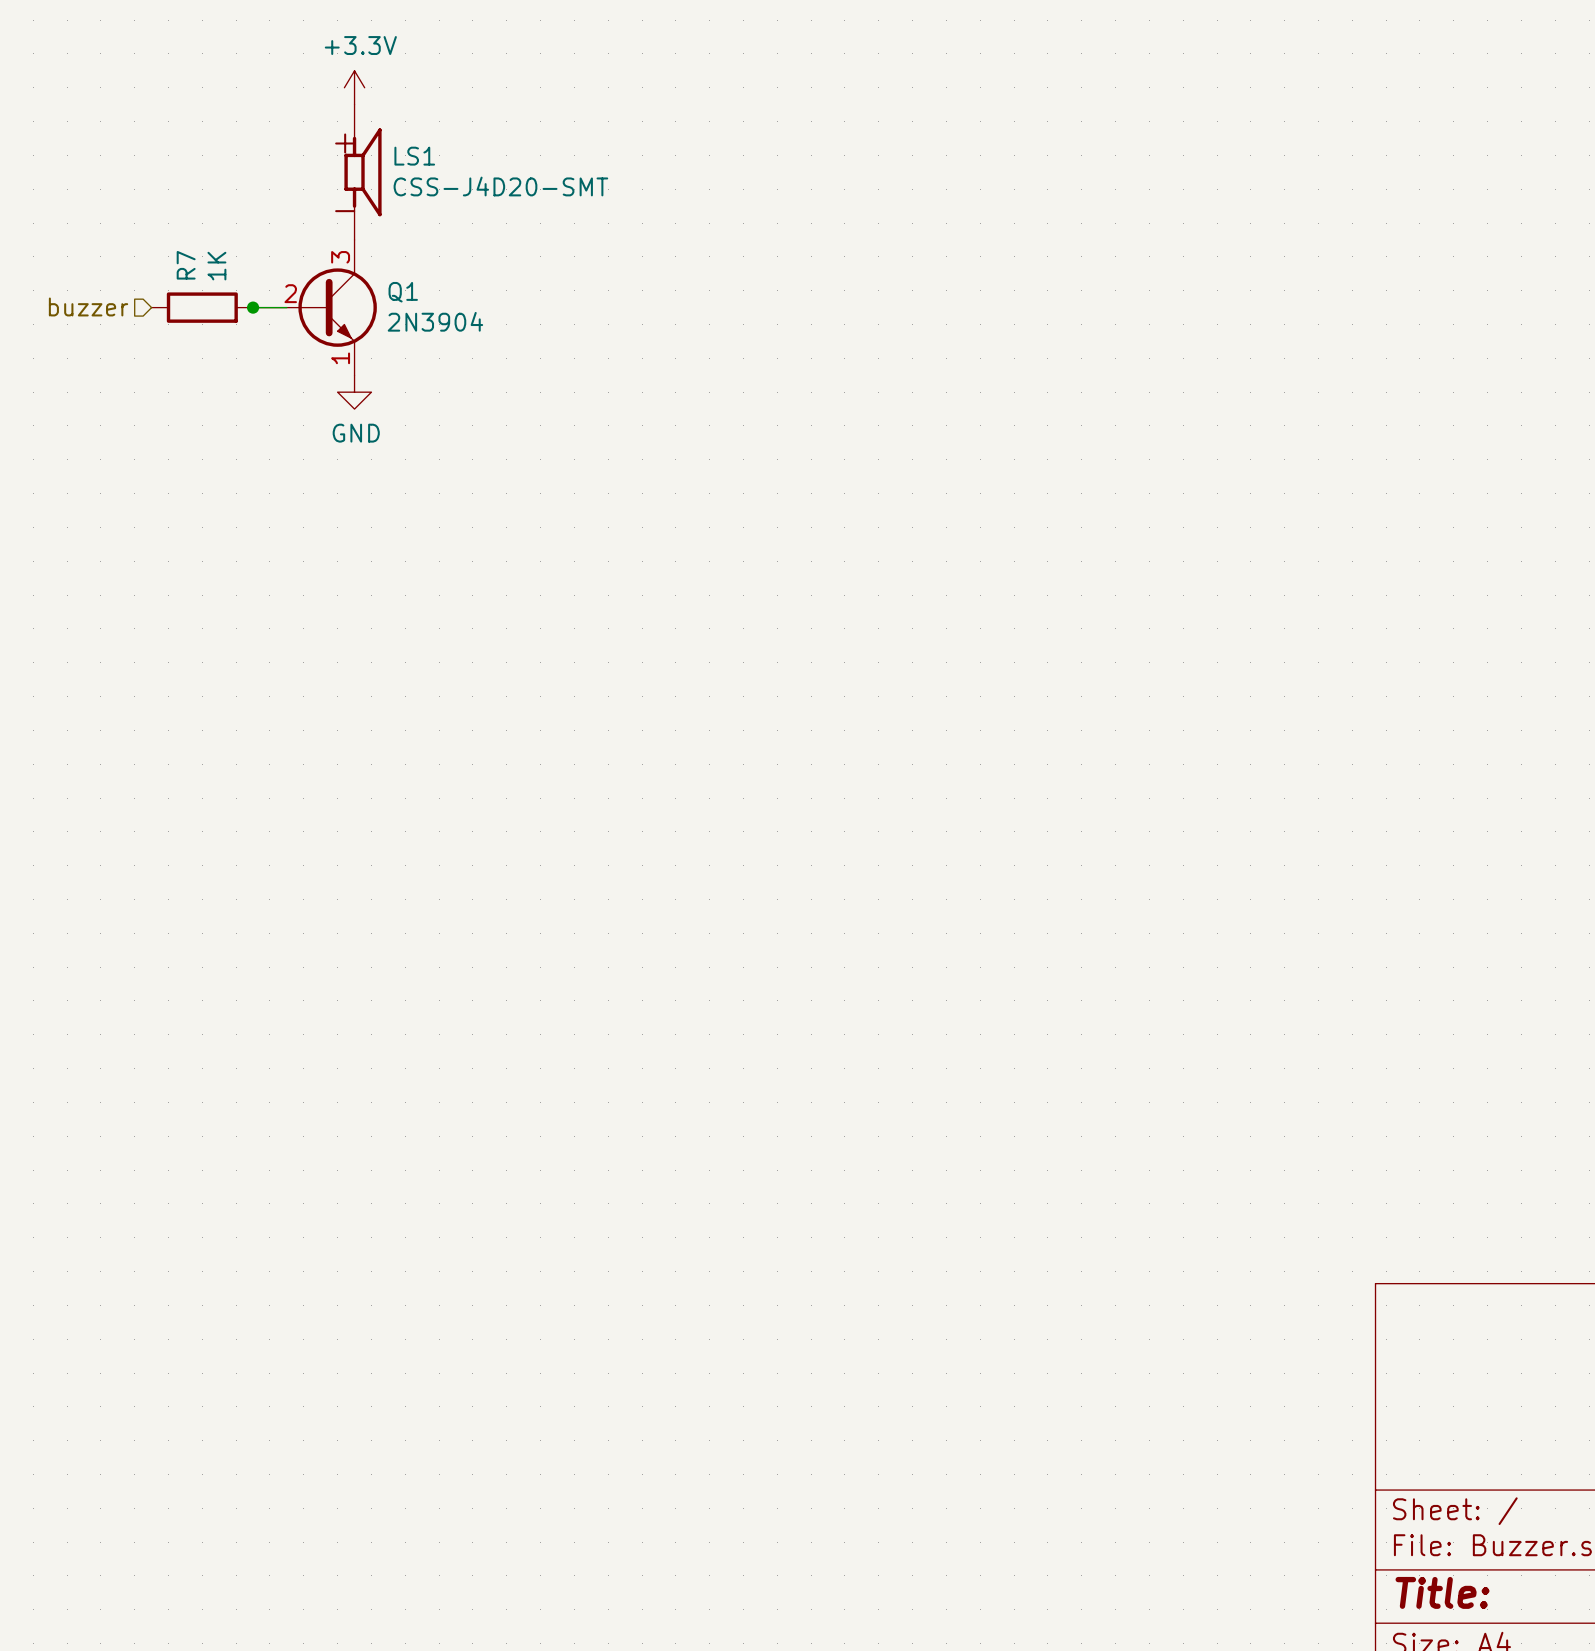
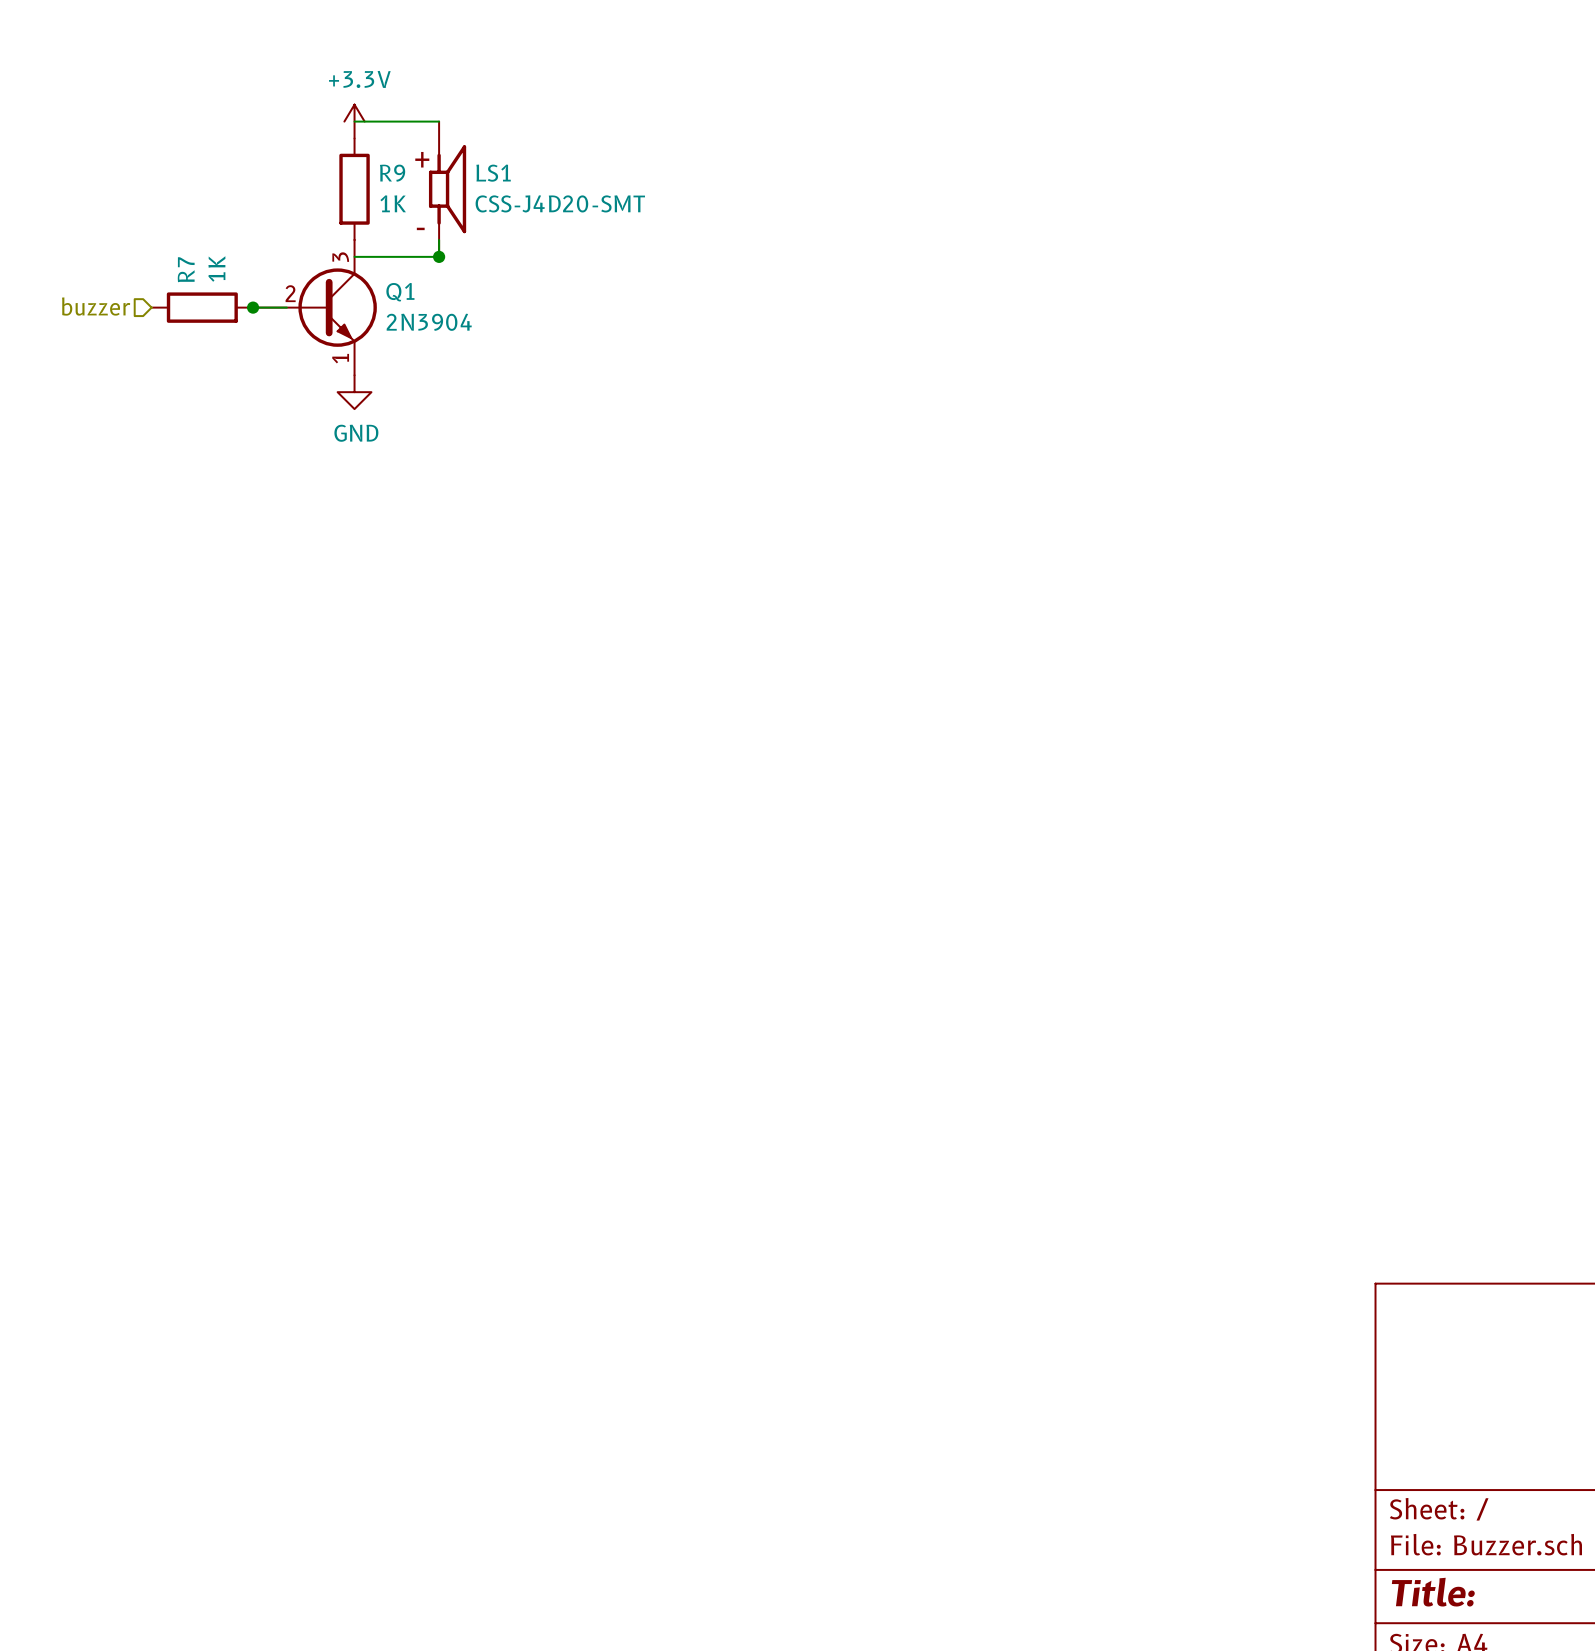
power symbol position: +3.3V (354, 87) -> +3.3V (354, 121)
wire: none -> (354, 121) (439, 121)
LS1 position: (362, 172) -> (447, 189)
R9: none -> 1K (354, 189)
wire: none -> (439, 239) (439, 256) (354, 256)
junction: none -> (439, 256)

